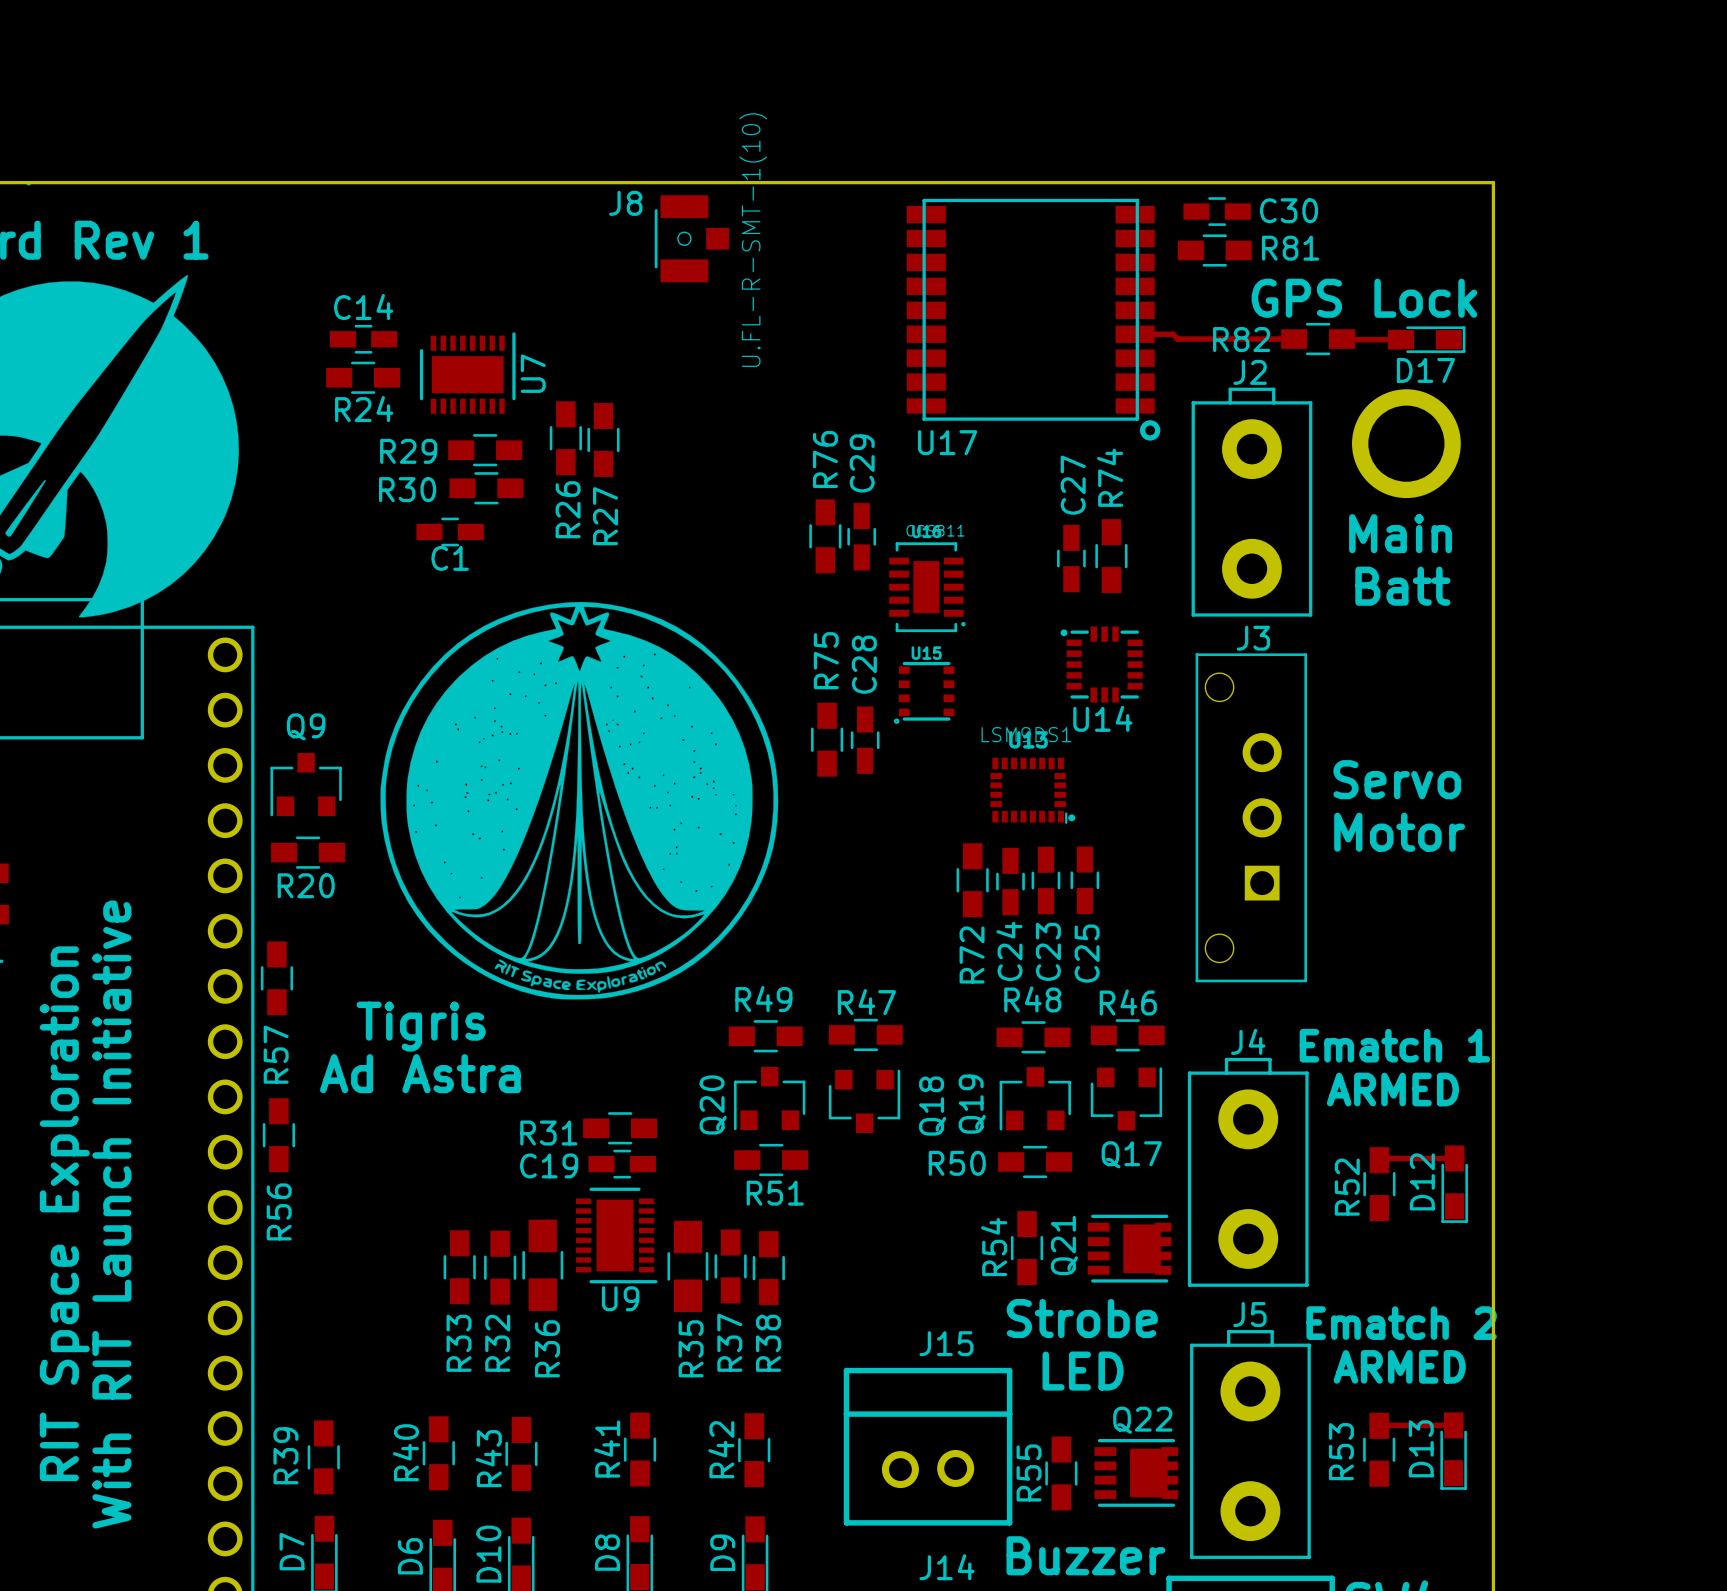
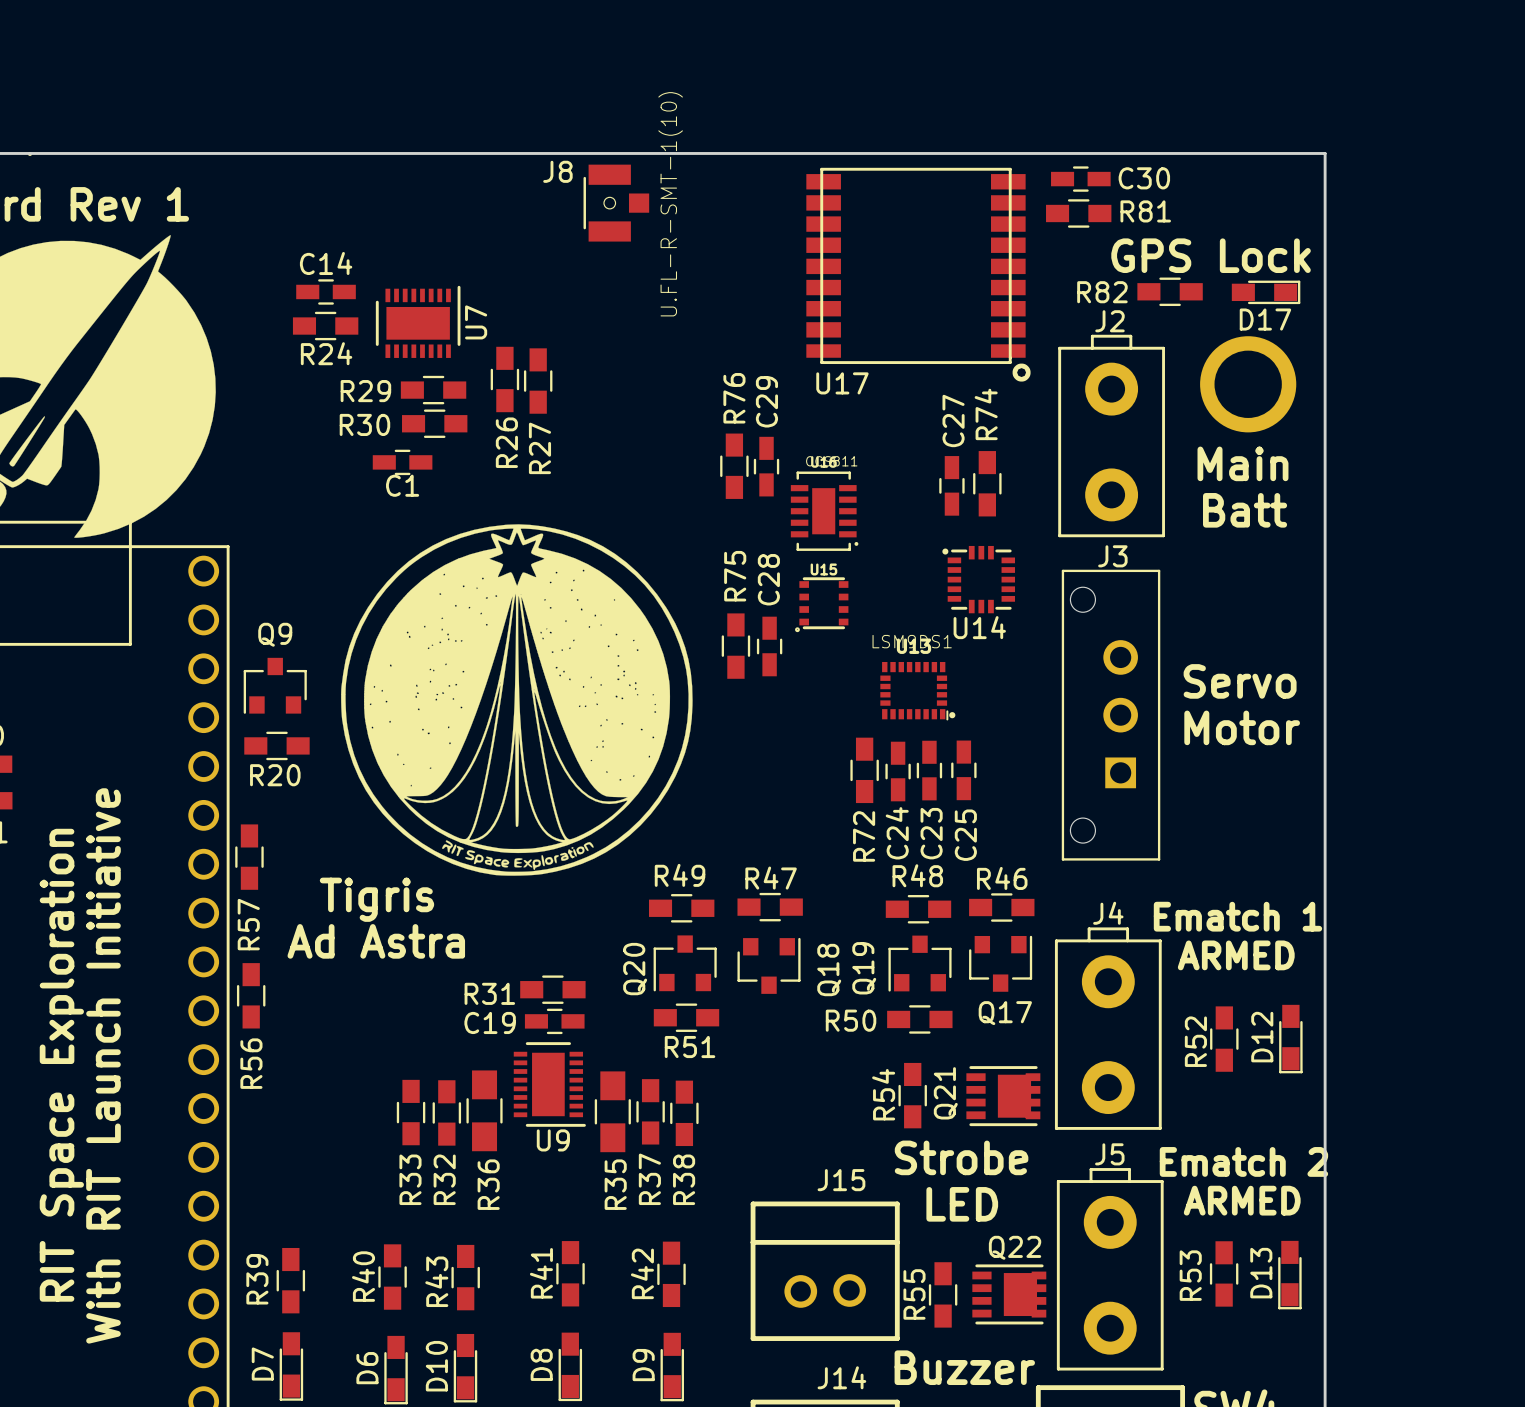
track: (1135, 334) (1172, 334) (1177, 339) (1294, 339) -> none
track: (1342, 339) (1400, 339) -> none
track: (1454, 1158) (1381, 1158) (1379, 1160) -> none
track: (1453, 1425) (1379, 1425) -> none

